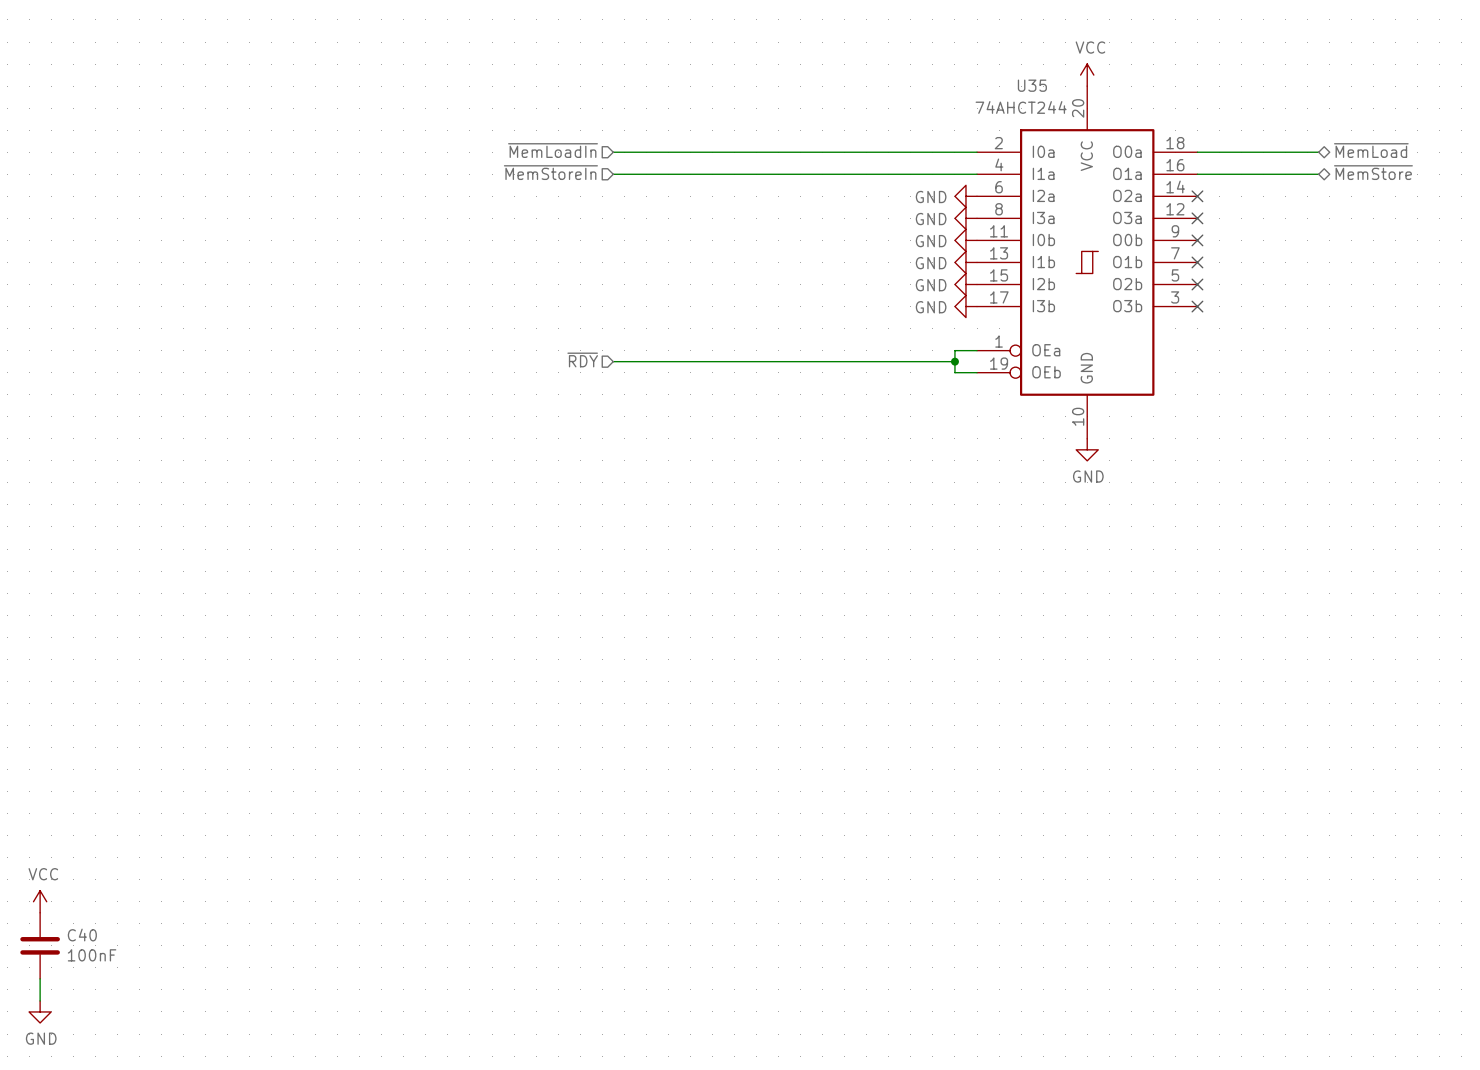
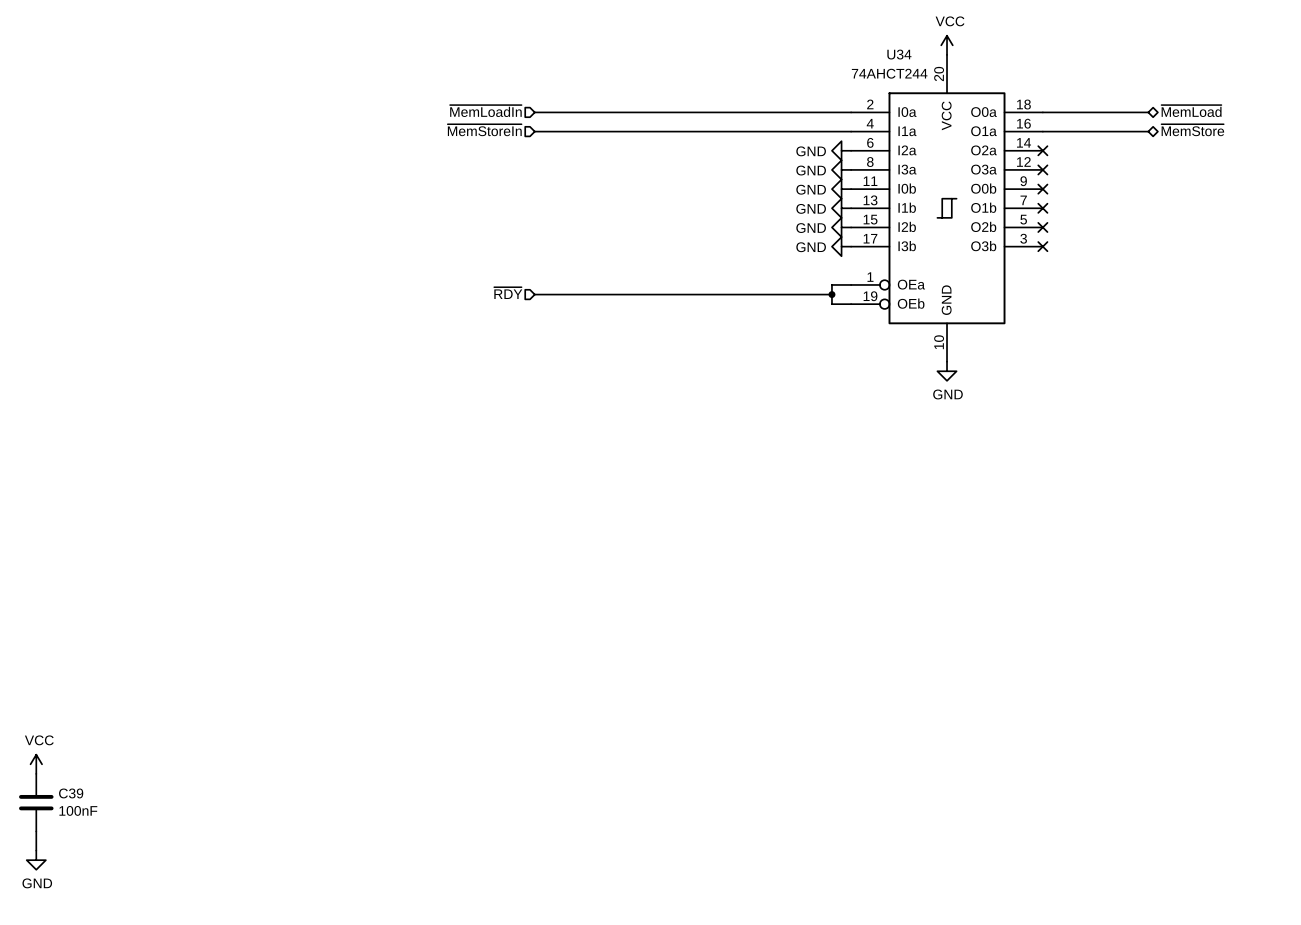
U35 name: U35 (1032, 85) -> U34 (899, 54)
C40 name: C40 (82, 935) -> C39 (71, 793)

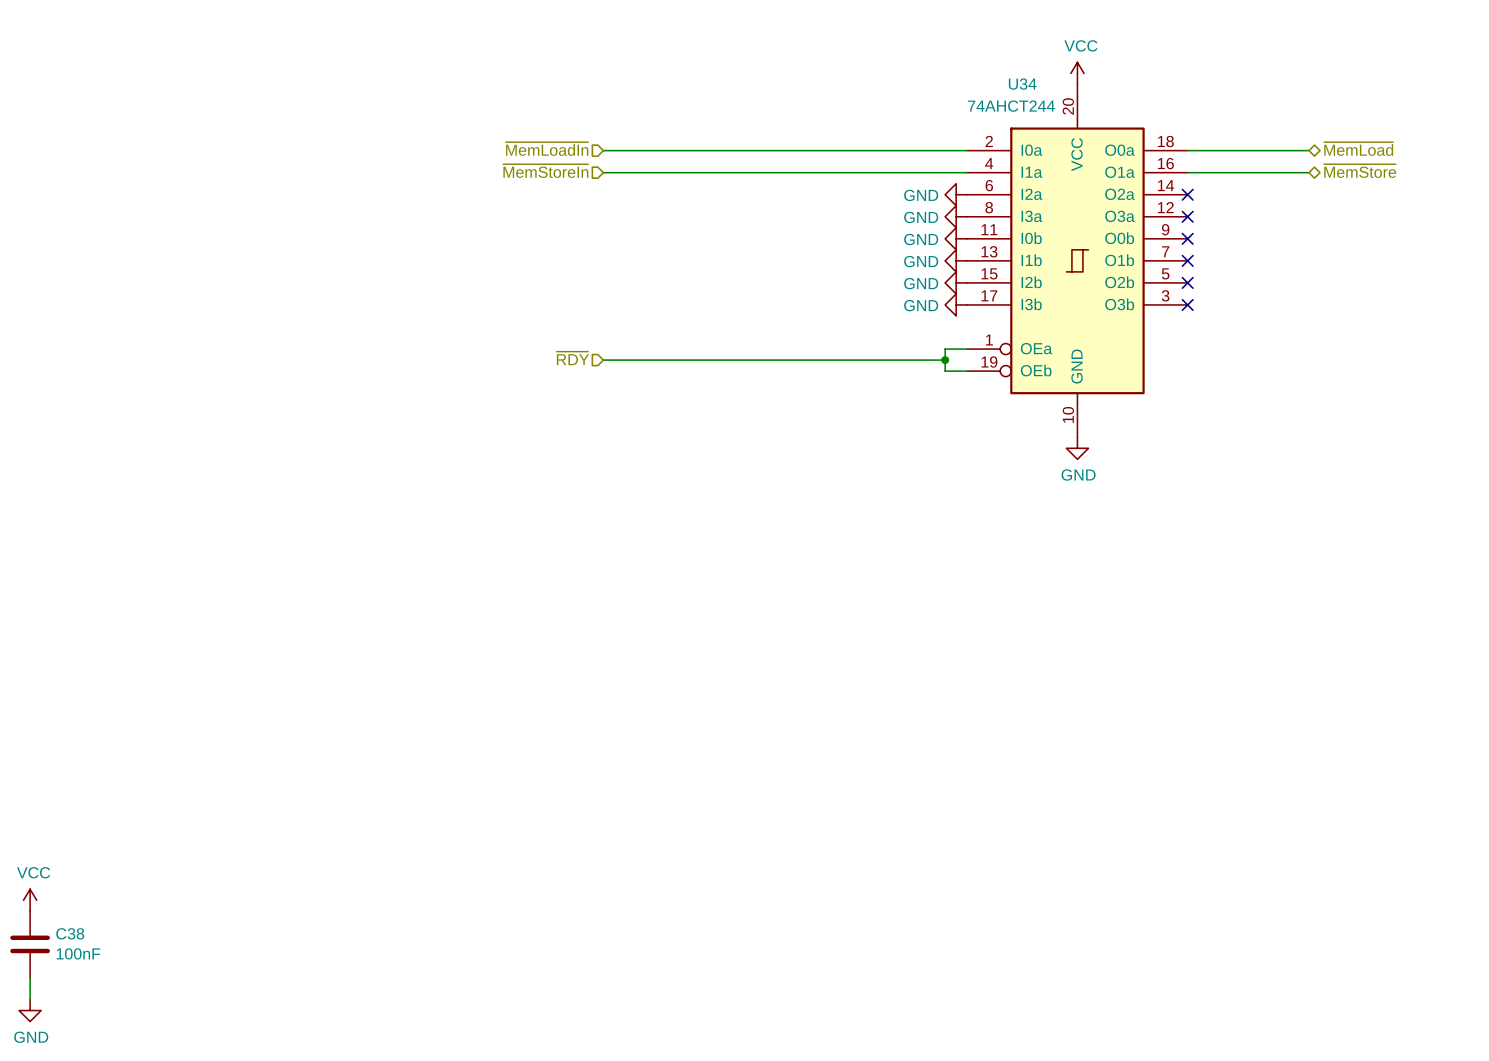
C39 name: C39 (71, 793) -> C38 (70, 933)

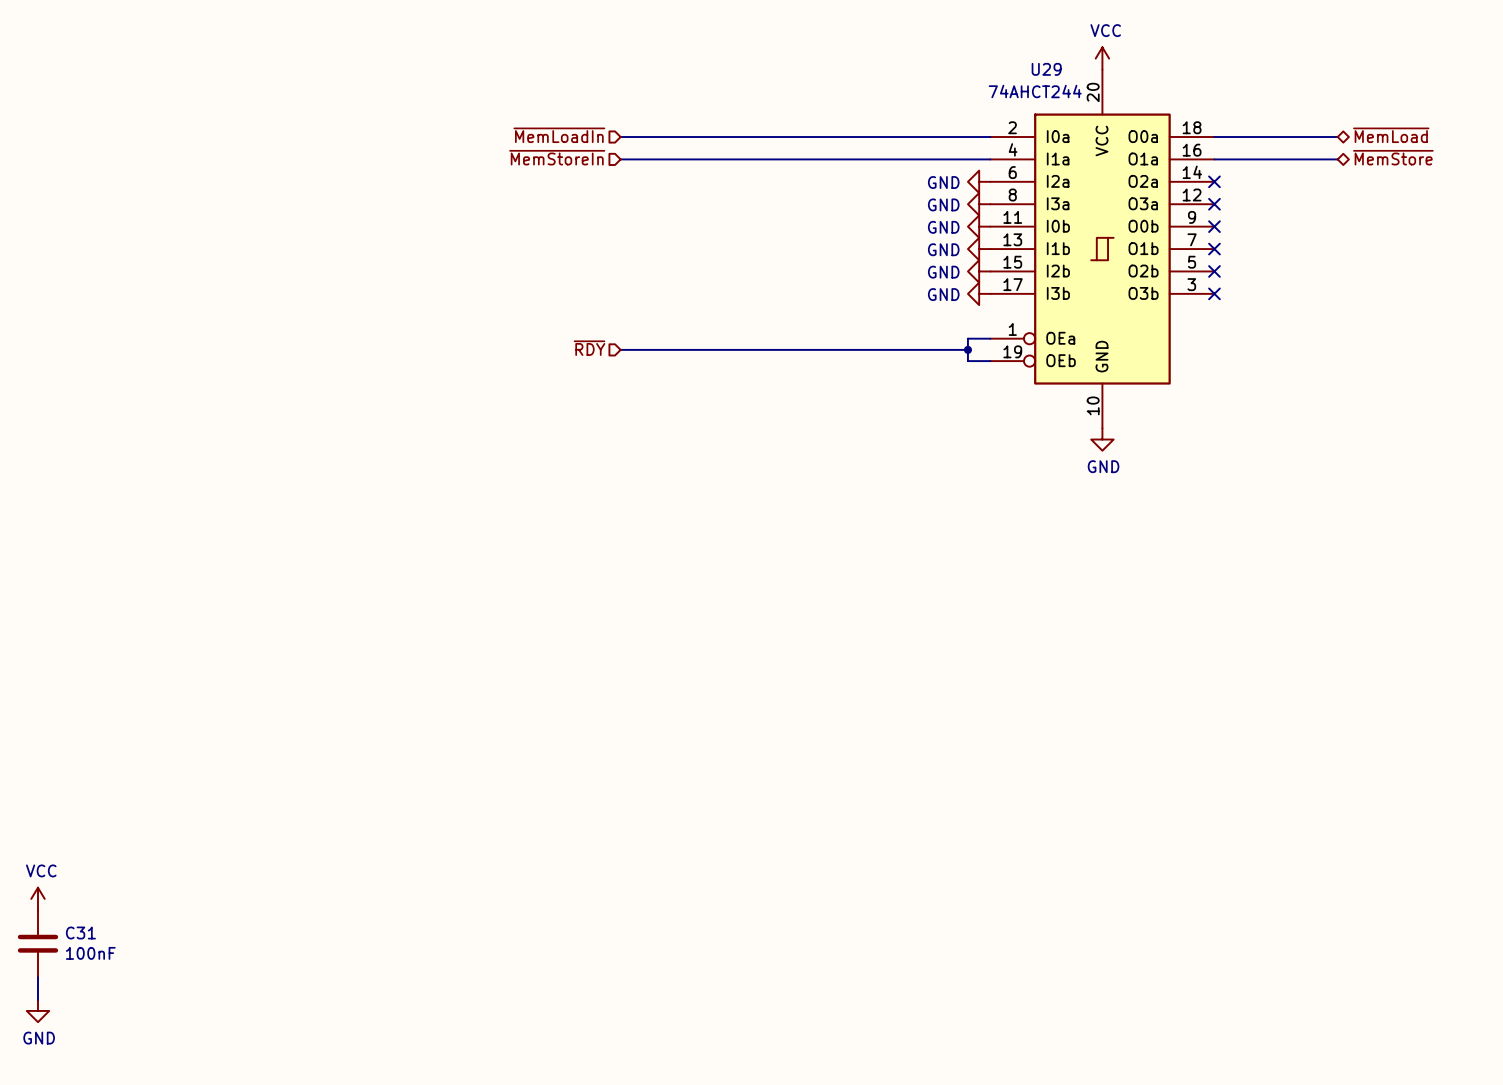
U34 name: U34 (1022, 84) -> U29 (1046, 69)
C38 name: C38 (70, 933) -> C31 (80, 933)

